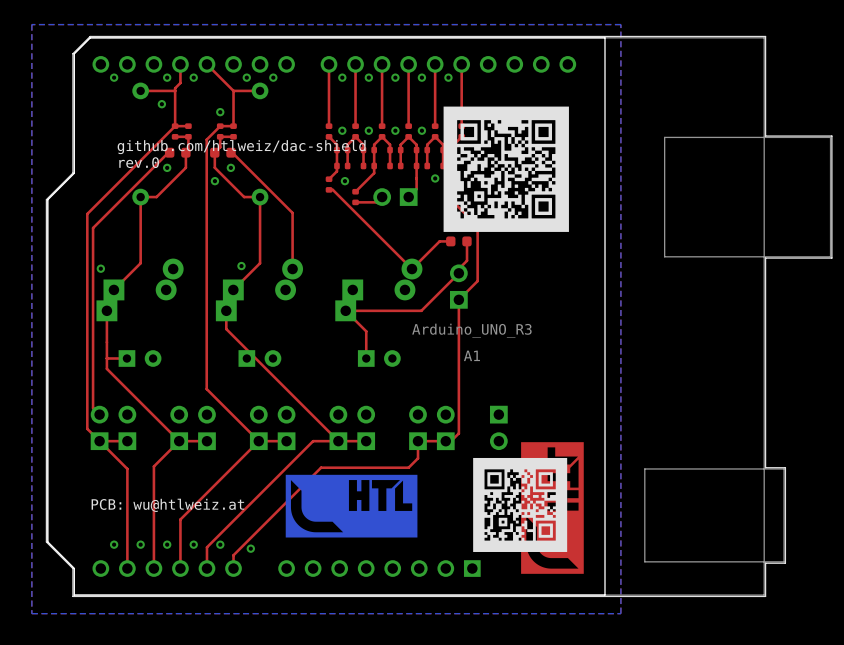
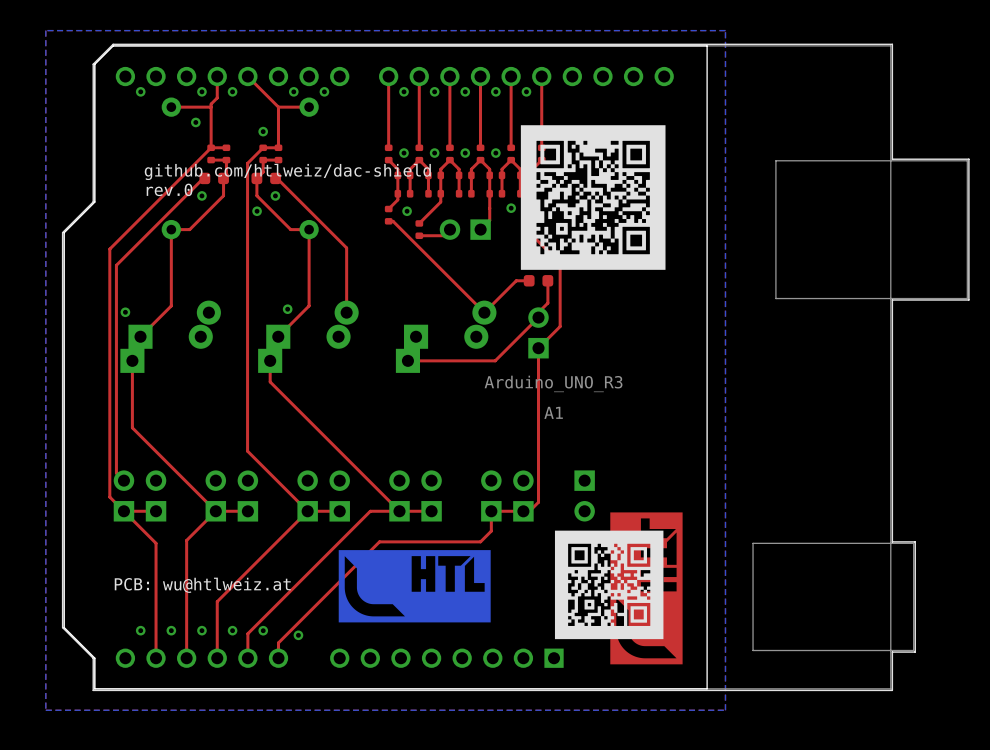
top track: (345, 310) (366, 331) (366, 358) -> none
top track: (106, 358) (126, 358) -> none
part: (140, 358) -> none
part: (259, 358) -> none
part: (379, 358) -> none

